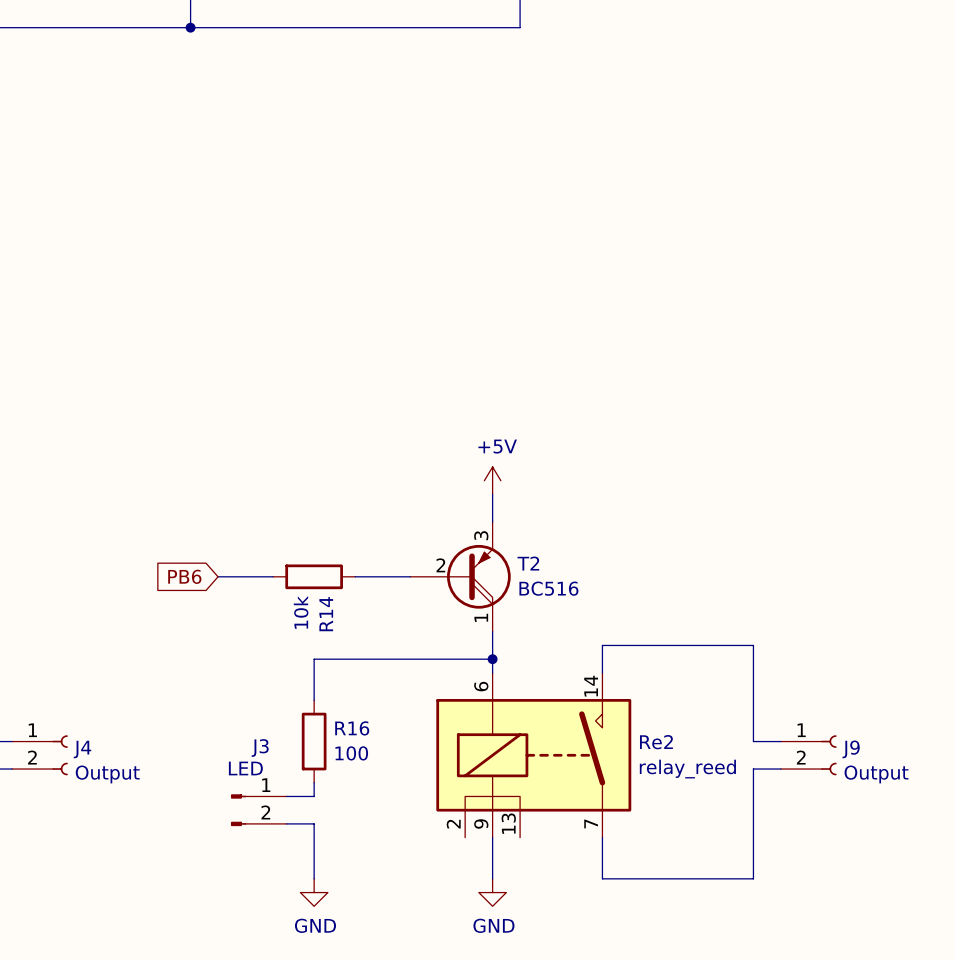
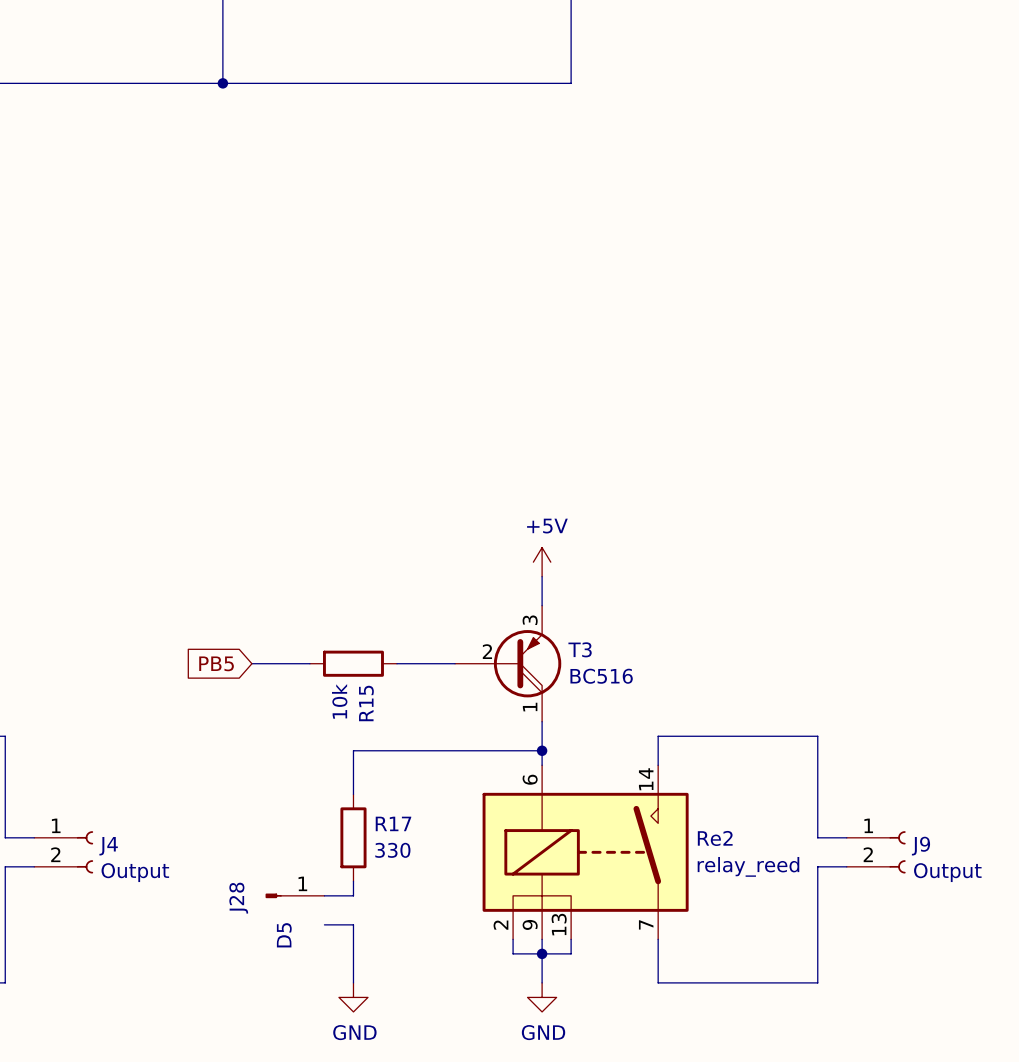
T2 name: T2 (528, 563) -> T3 (580, 649)
global label: PB6 (184, 576) -> PB5 (216, 663)
R14 name: R14 (326, 614) -> R15 (366, 703)
R16 name: R16 (352, 728) -> R17 (393, 823)
R16 value: 100 (351, 753) -> 330 (392, 850)
J28: none -> D5 (295, 895)
J3: LED (258, 810) -> none
wire: none -> (513, 939) (513, 953) (571, 953) (571, 939)
junction: none -> (542, 953)

